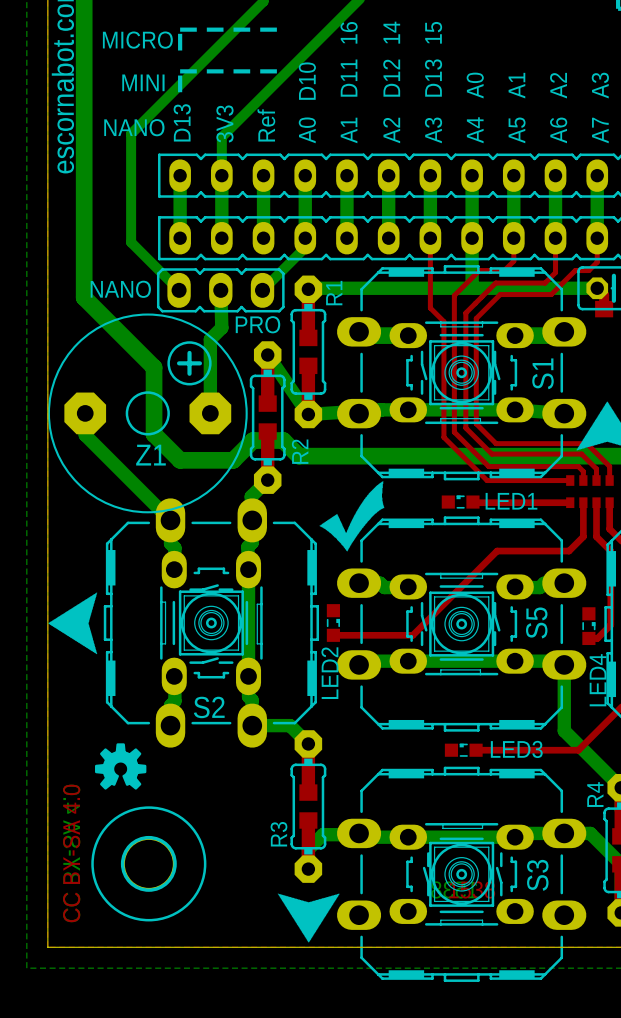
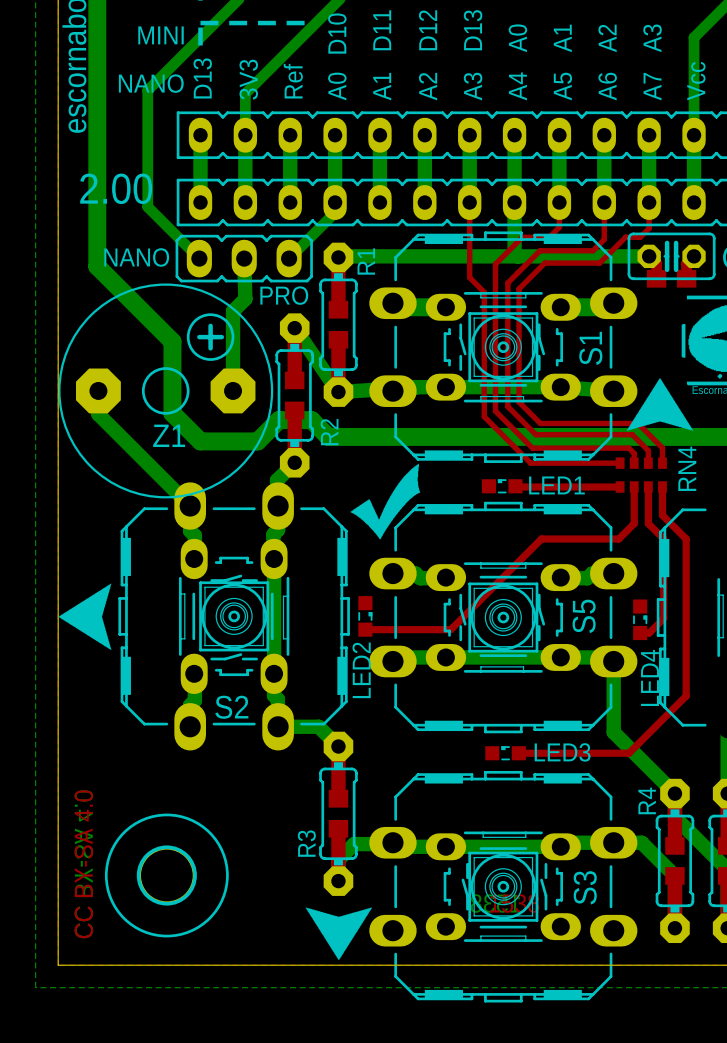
text: none -> 2.00 (116, 188)
drawing: [95, 743, 147, 790] -> none

